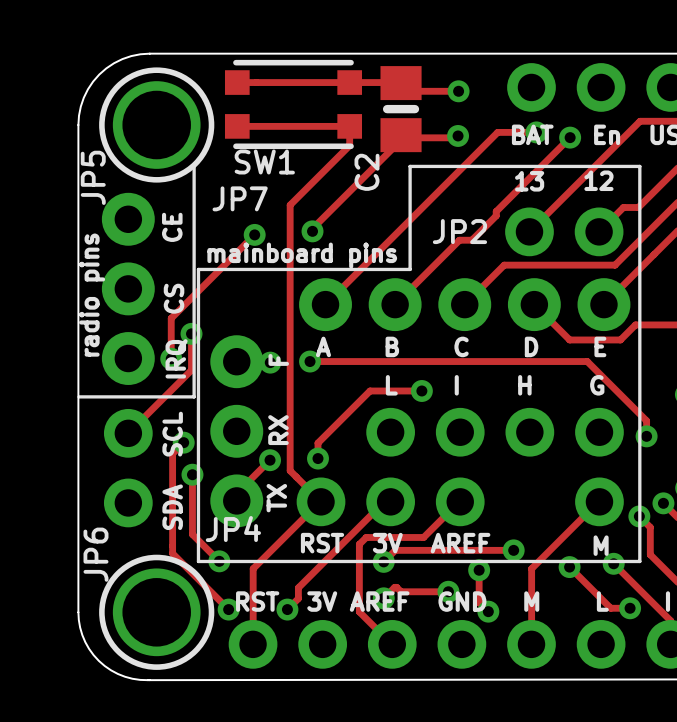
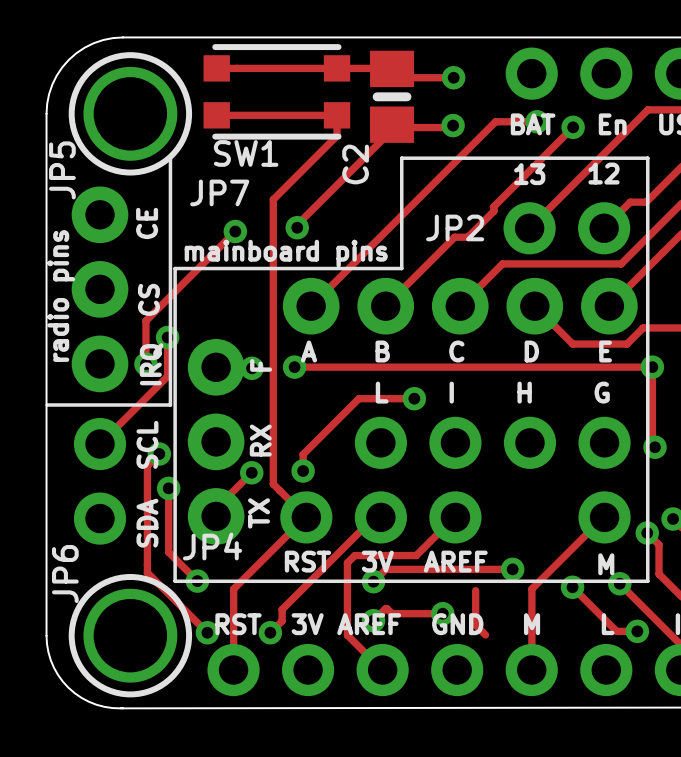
track: (587, 361) (646, 420) (646, 436) -> (591, 367) (652, 367) (652, 444)
via: none -> (652, 367)
via: (479, 570) -> none
via: (488, 611) -> none

